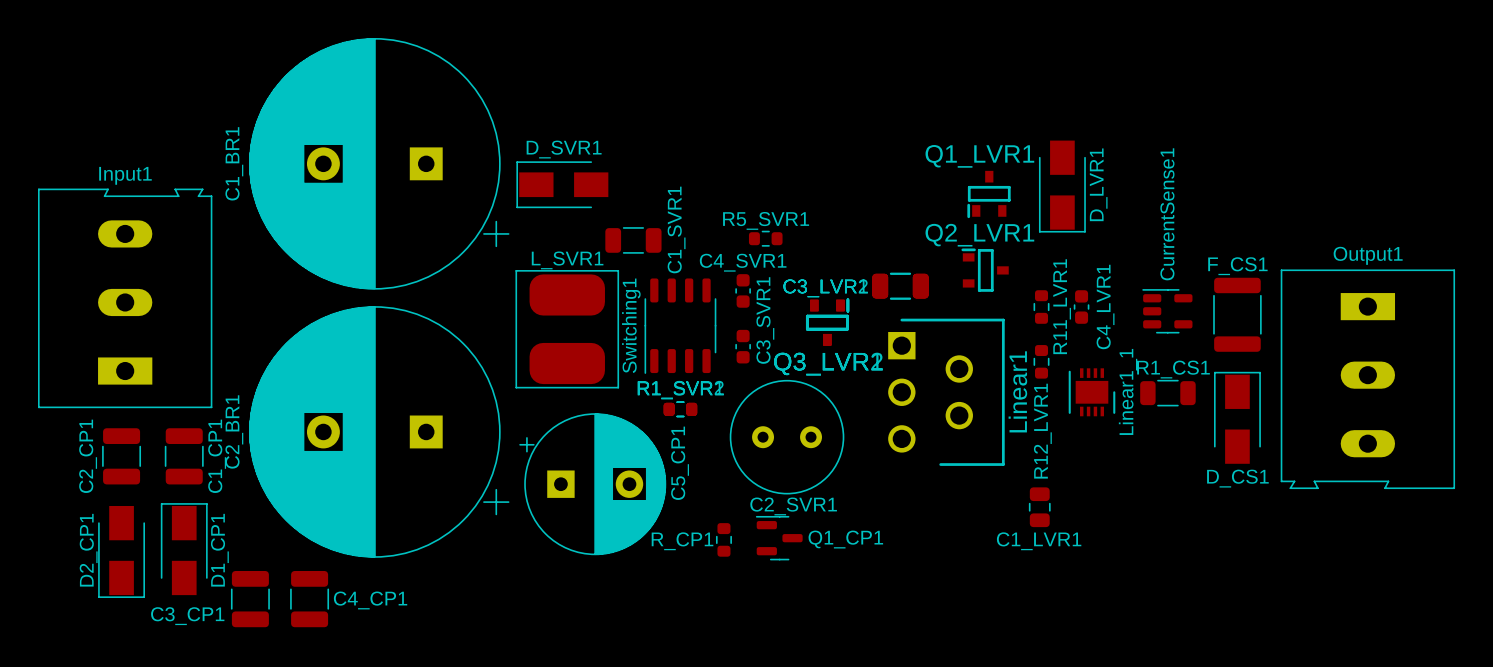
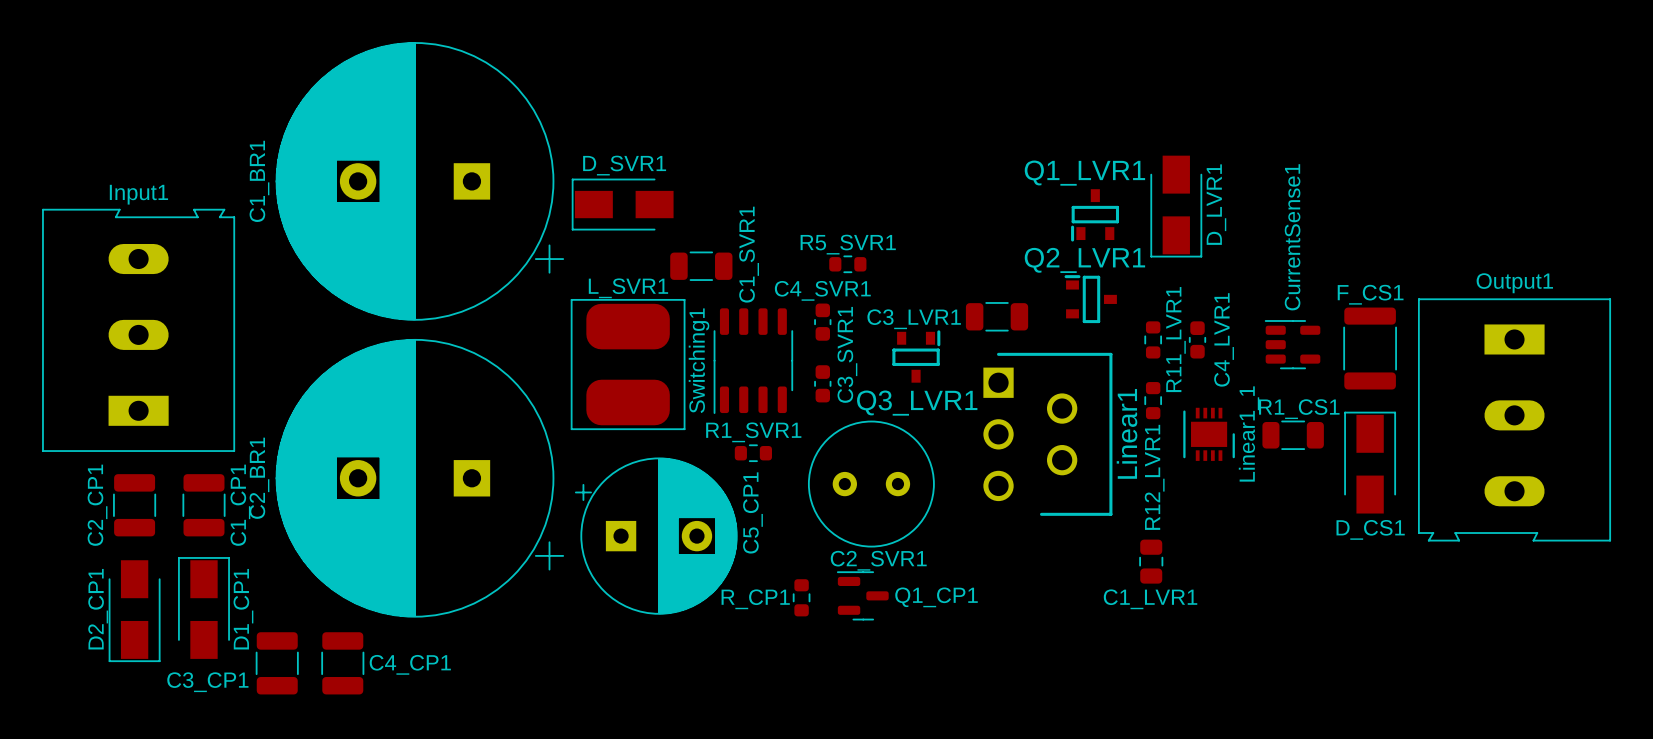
part: (900, 286) -> none
part: (827, 321) -> none
part: (680, 409) -> none

